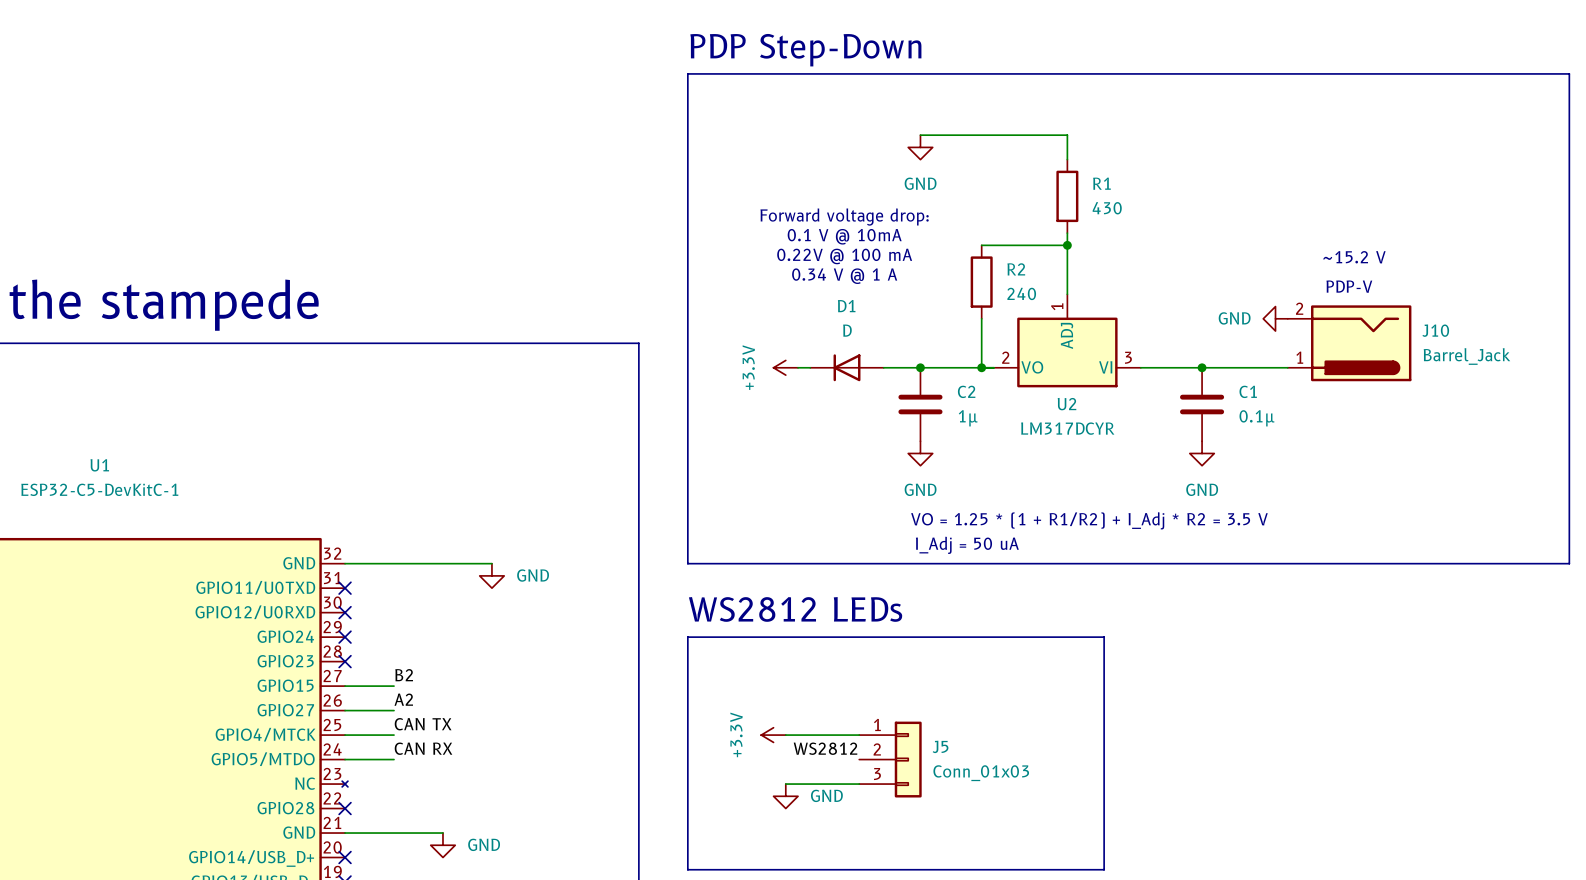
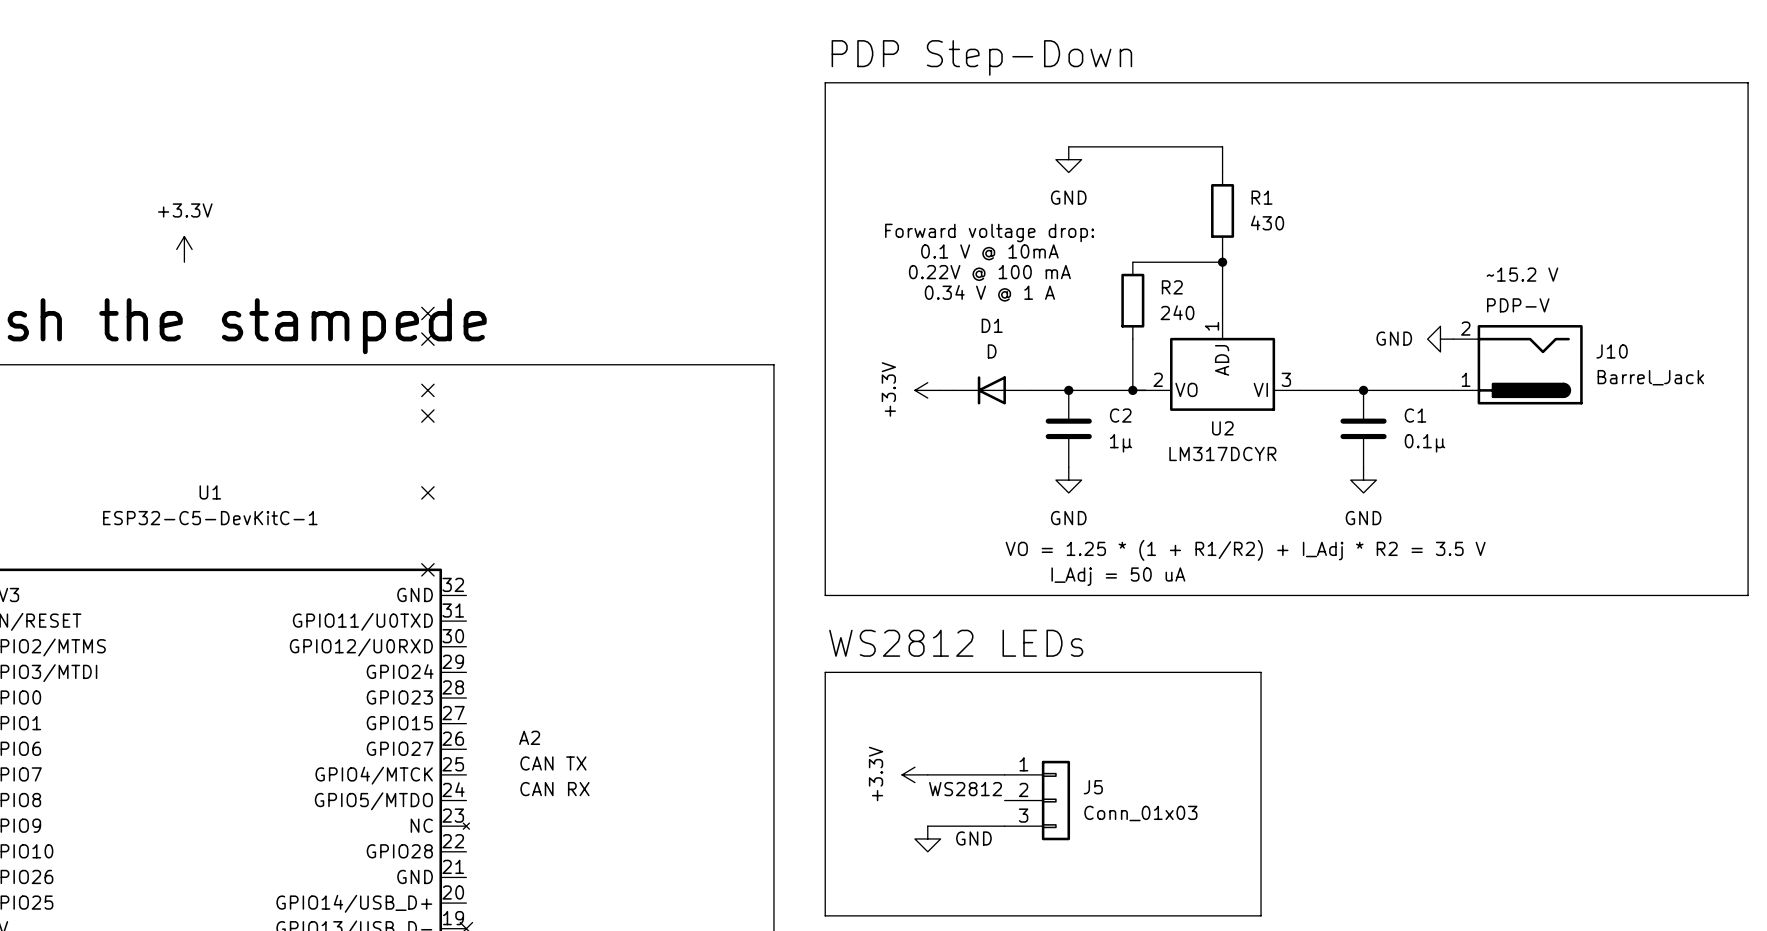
power symbol: none -> +3.3V (184, 249)
no-connect mark: none -> (427, 313)
no-connect mark: none -> (427, 339)
no-connect mark: none -> (427, 390)
no-connect mark: none -> (427, 416)
no-connect mark: none -> (427, 492)
no-connect mark: none -> (427, 569)
wire: (345, 563) (491, 563) -> none
power symbol: GND (491, 575) -> none
no-connect mark: (345, 588) -> none
no-connect mark: (345, 612) -> none
no-connect mark: (345, 637) -> none
no-connect mark: (345, 661) -> none
label: B2 (404, 675) -> none
wire: (345, 686) (394, 686) -> none
wire: (345, 710) (394, 710) -> none
wire: (345, 735) (394, 735) -> none
wire: (345, 759) (394, 759) -> none
no-connect mark: (345, 808) -> none
wire: (345, 833) (442, 833) -> none
power symbol: GND (442, 845) -> none
no-connect mark: (345, 857) -> none

